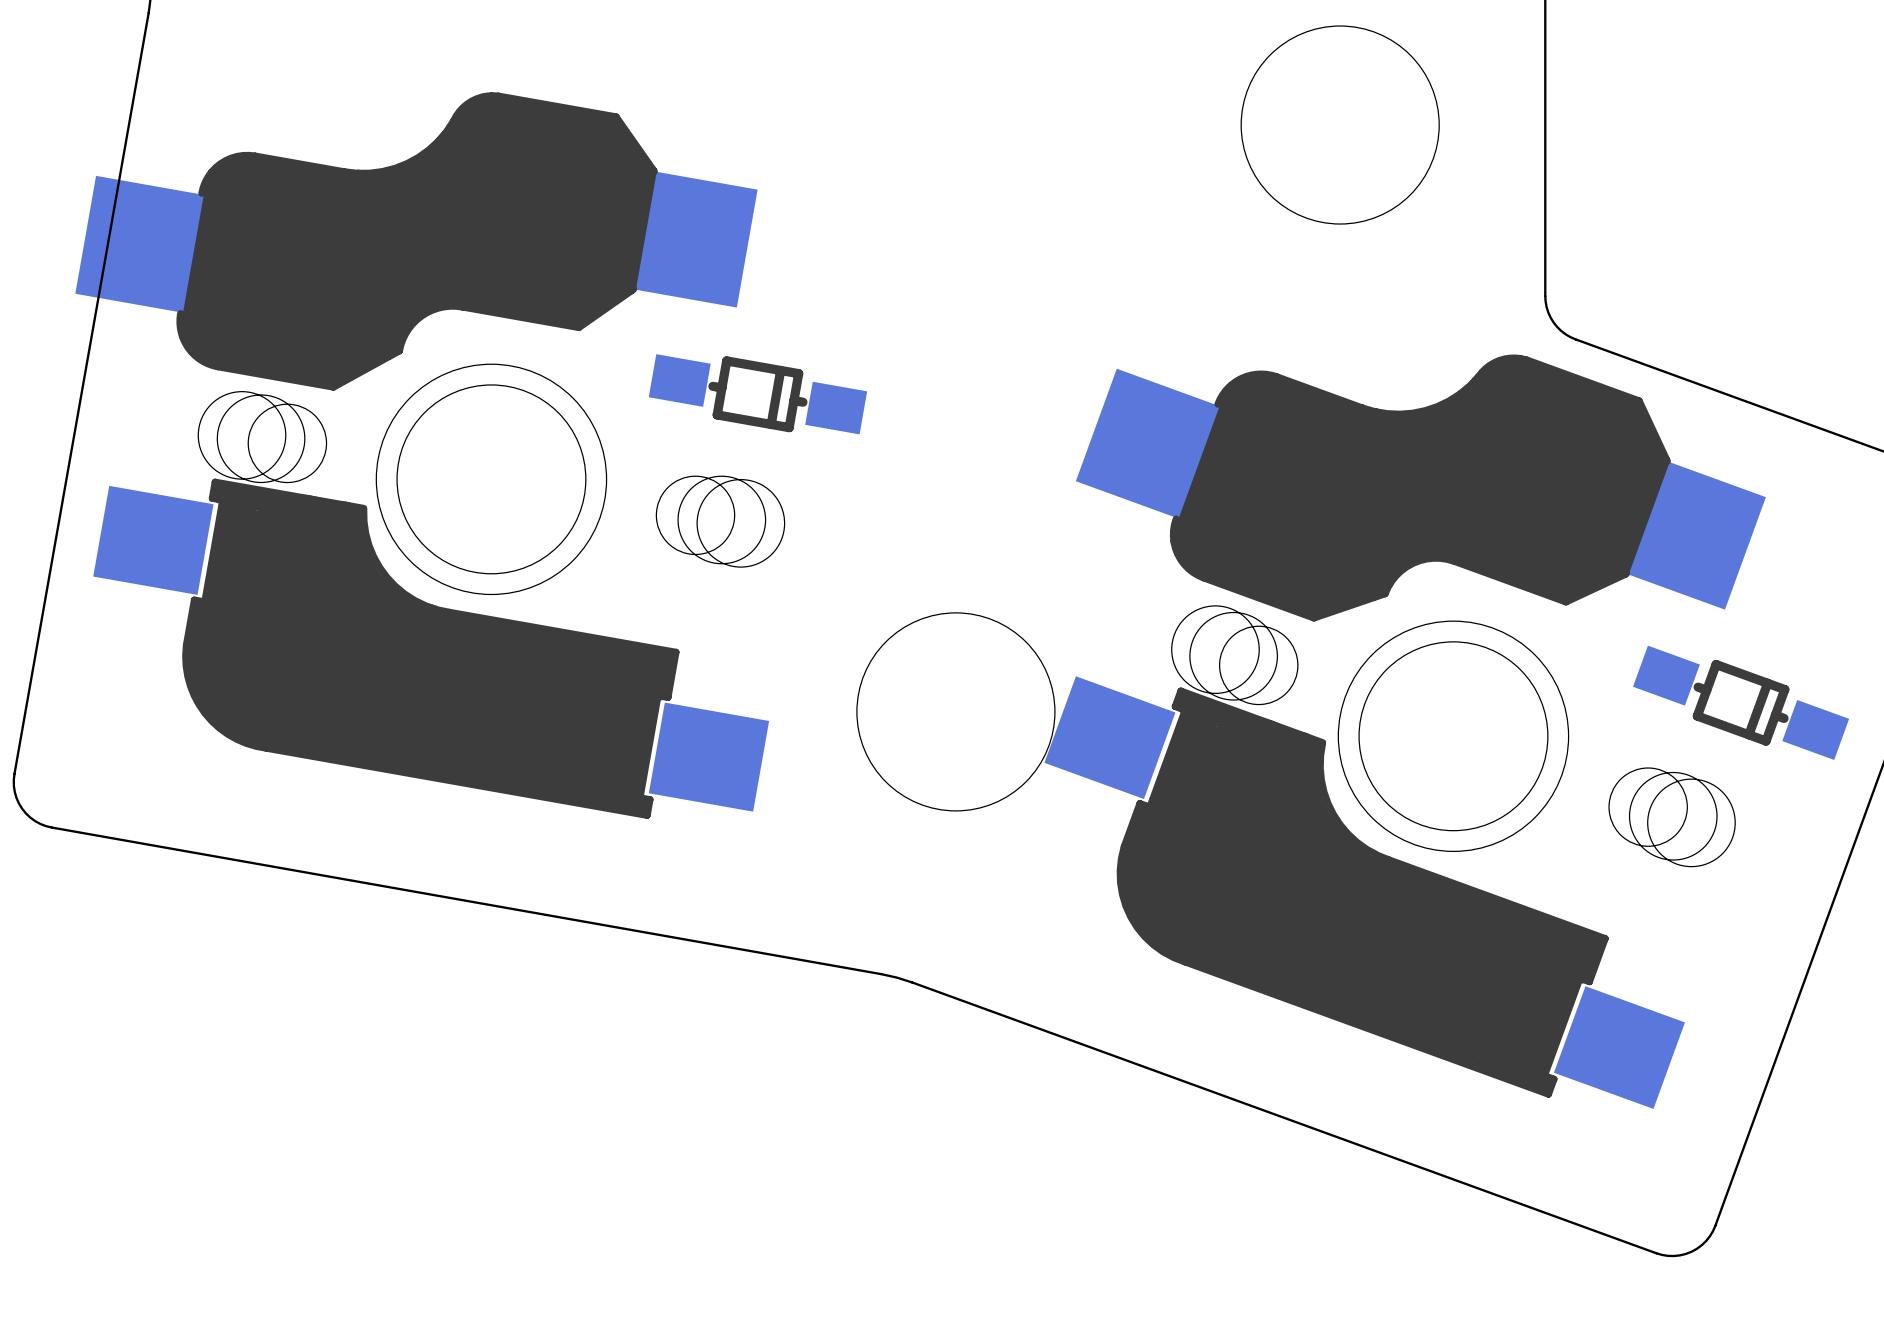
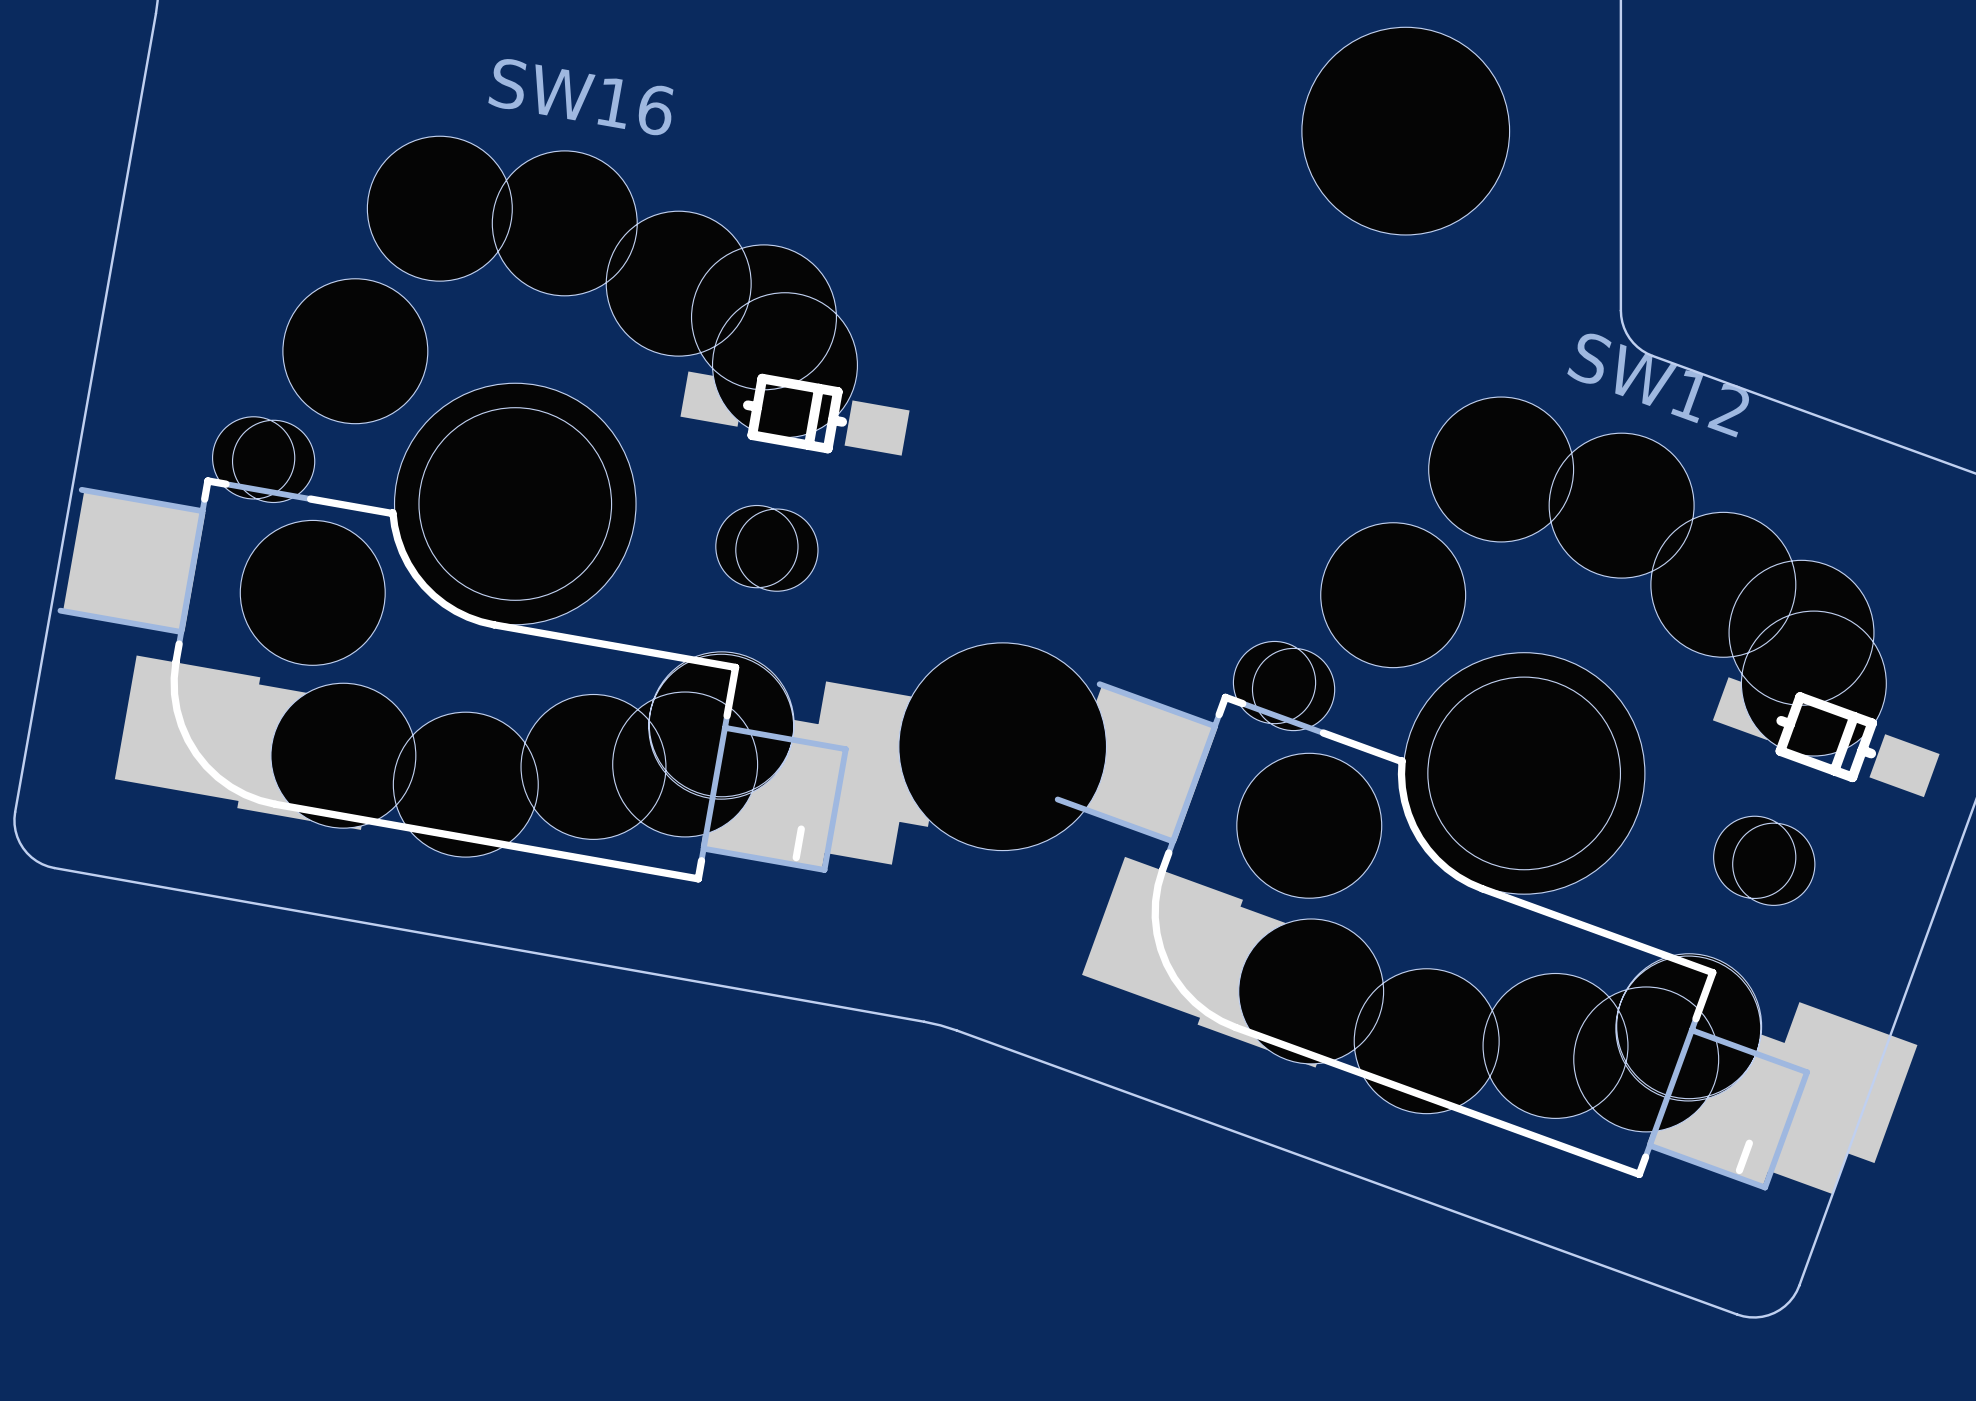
part: (429, 455) -> none
SW16: none -> (503, 509)
part: (1405, 731) -> none
SW12: none -> (1486, 795)

